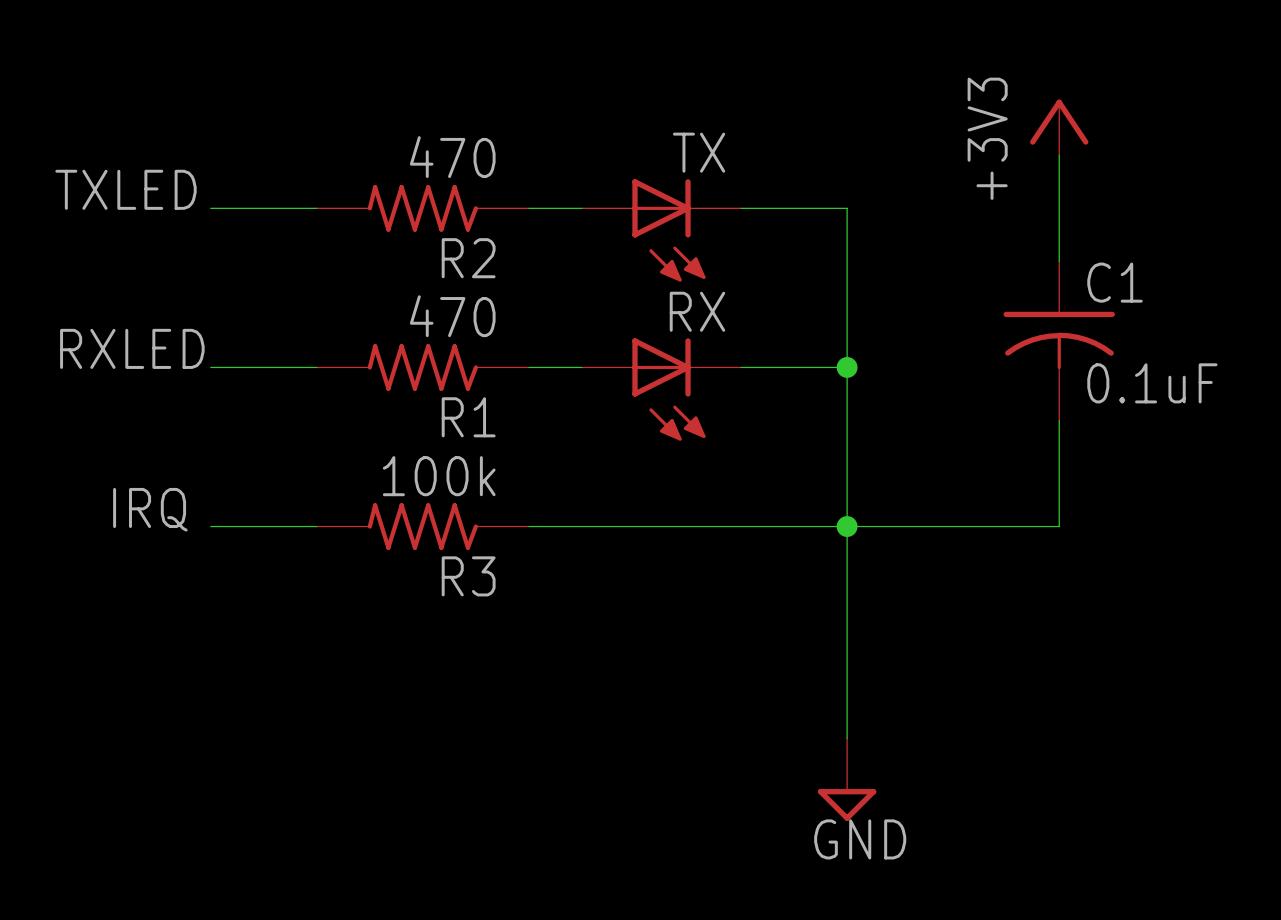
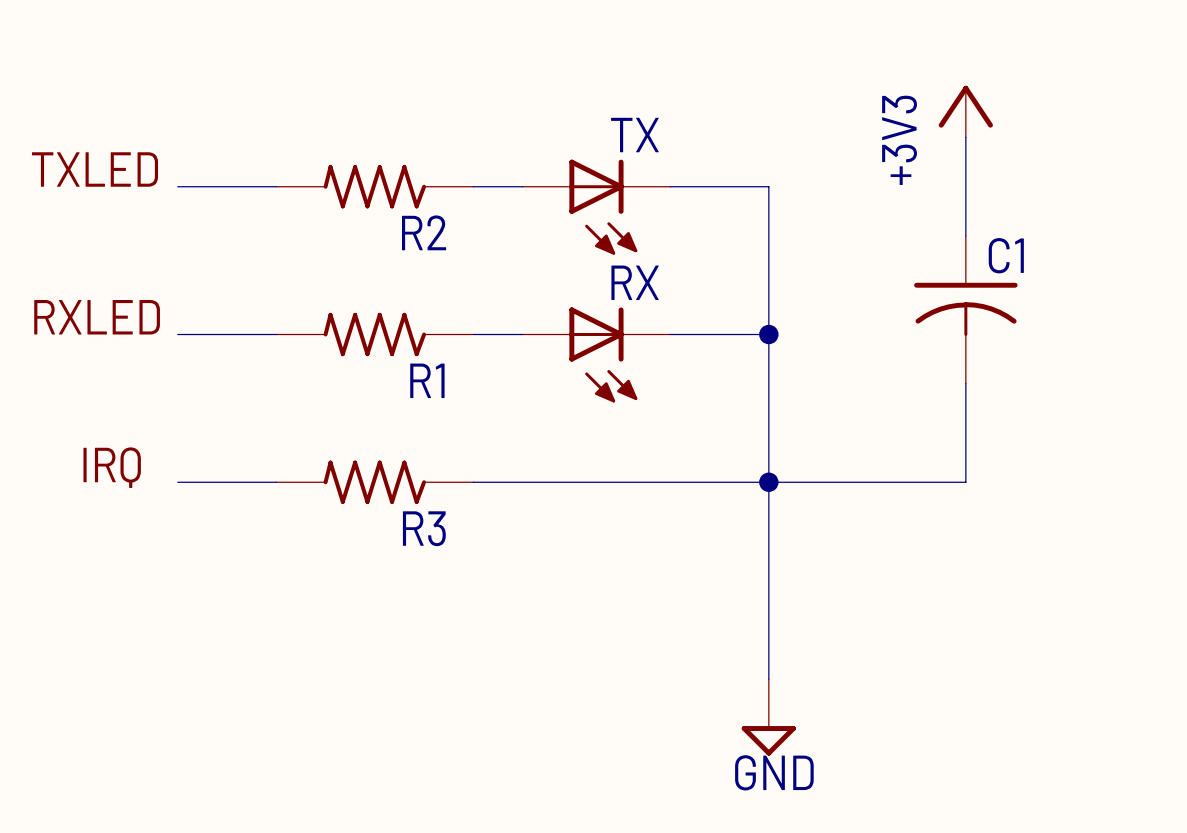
R2 value: 470 (452, 157) -> none
R1 value: 470 (452, 316) -> none
C1 value: 0.1uF (1152, 383) -> none
R3 value: 100k (439, 476) -> none

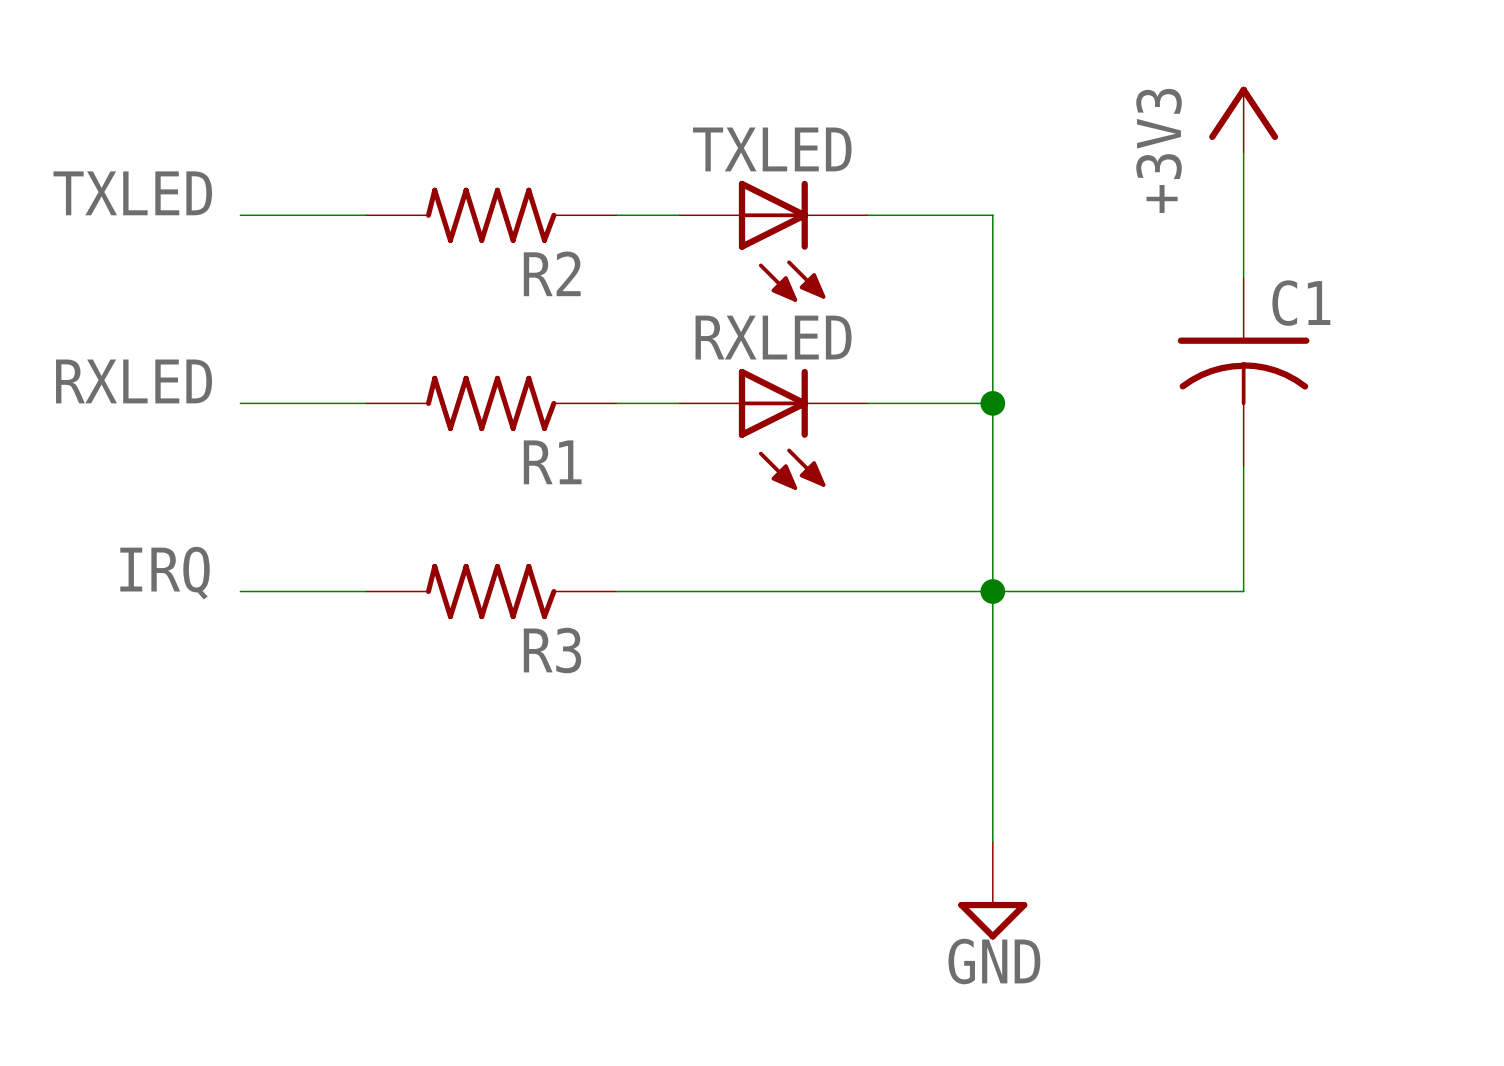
TX name: TX (634, 135) -> TXLED (772, 149)
RX name: RX (635, 282) -> RXLED (773, 337)

